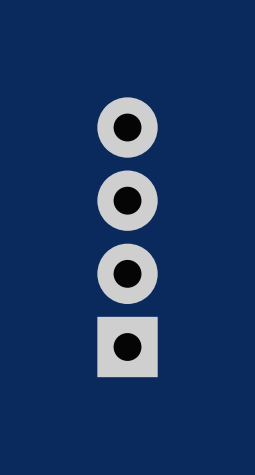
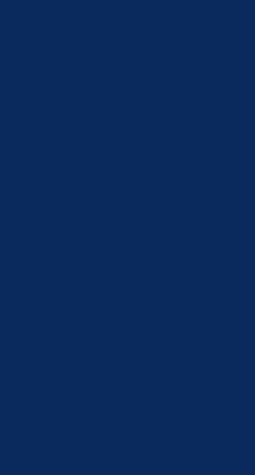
part: (127, 237) -> none

